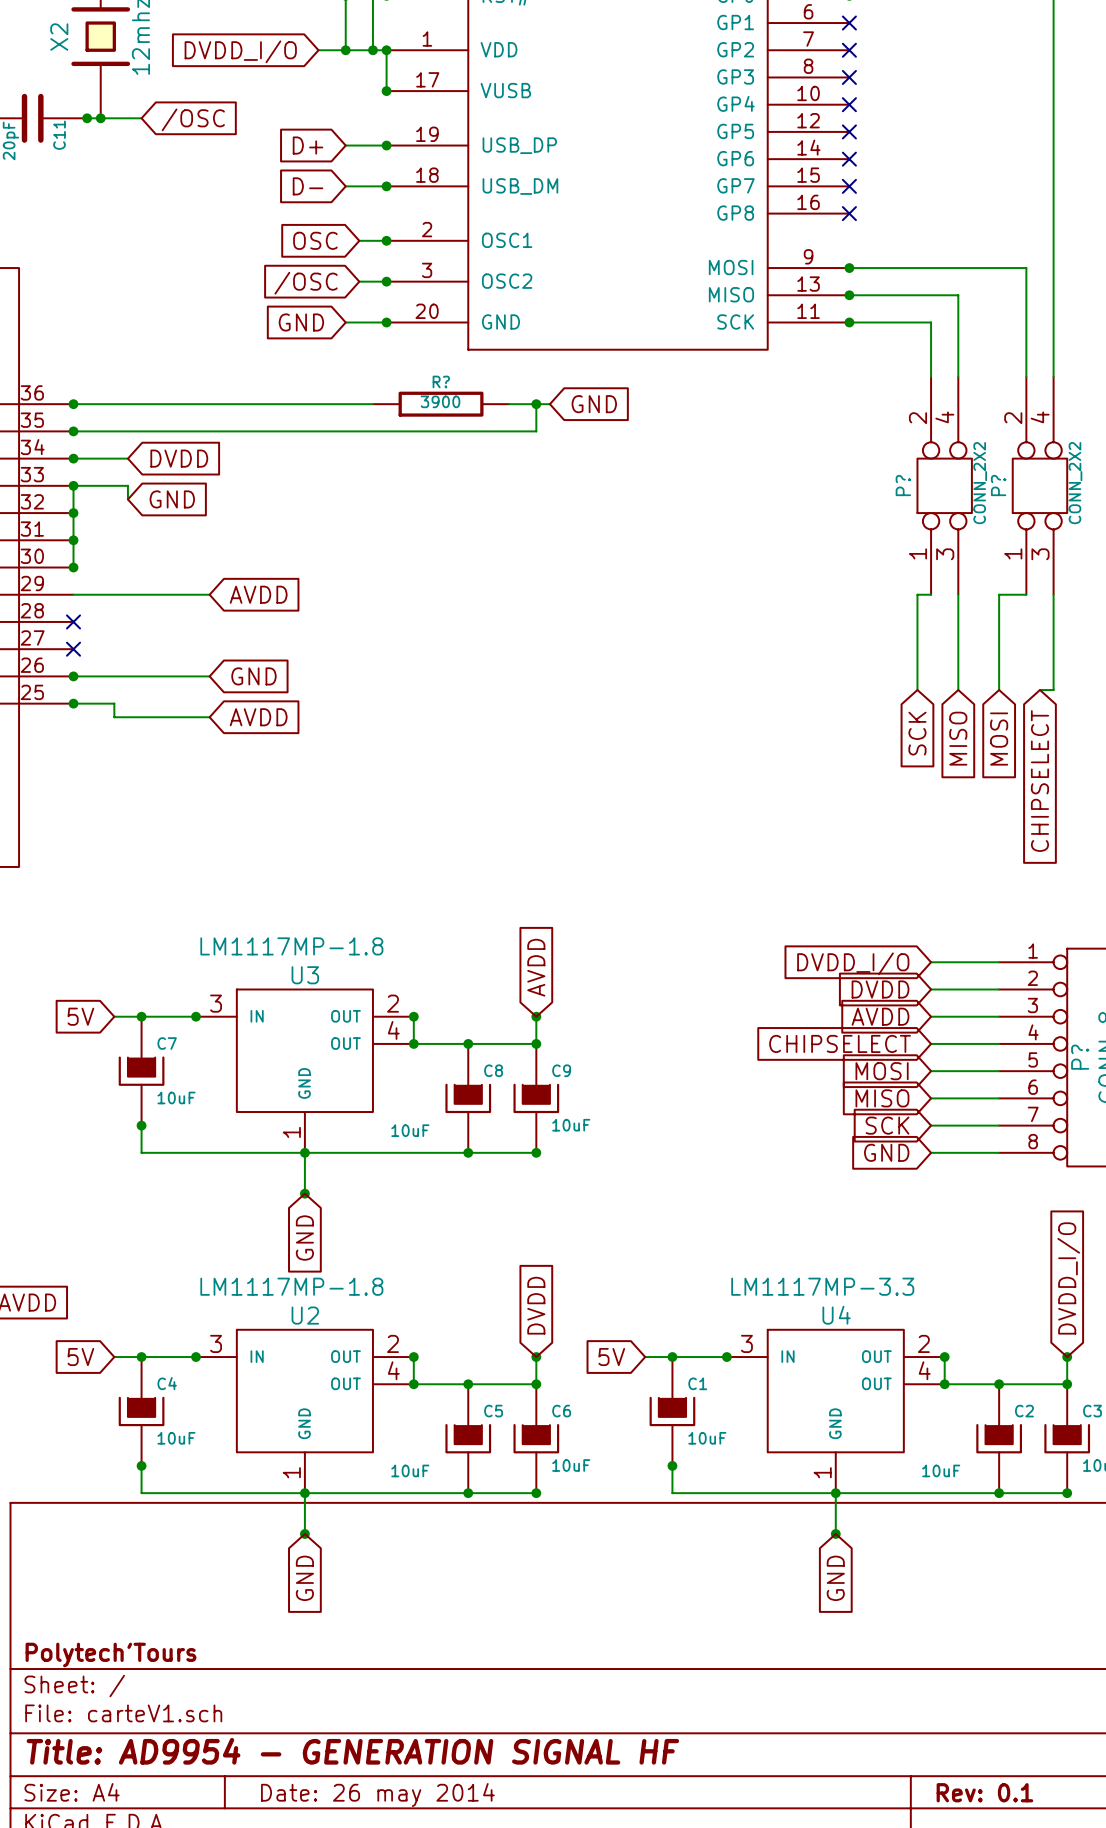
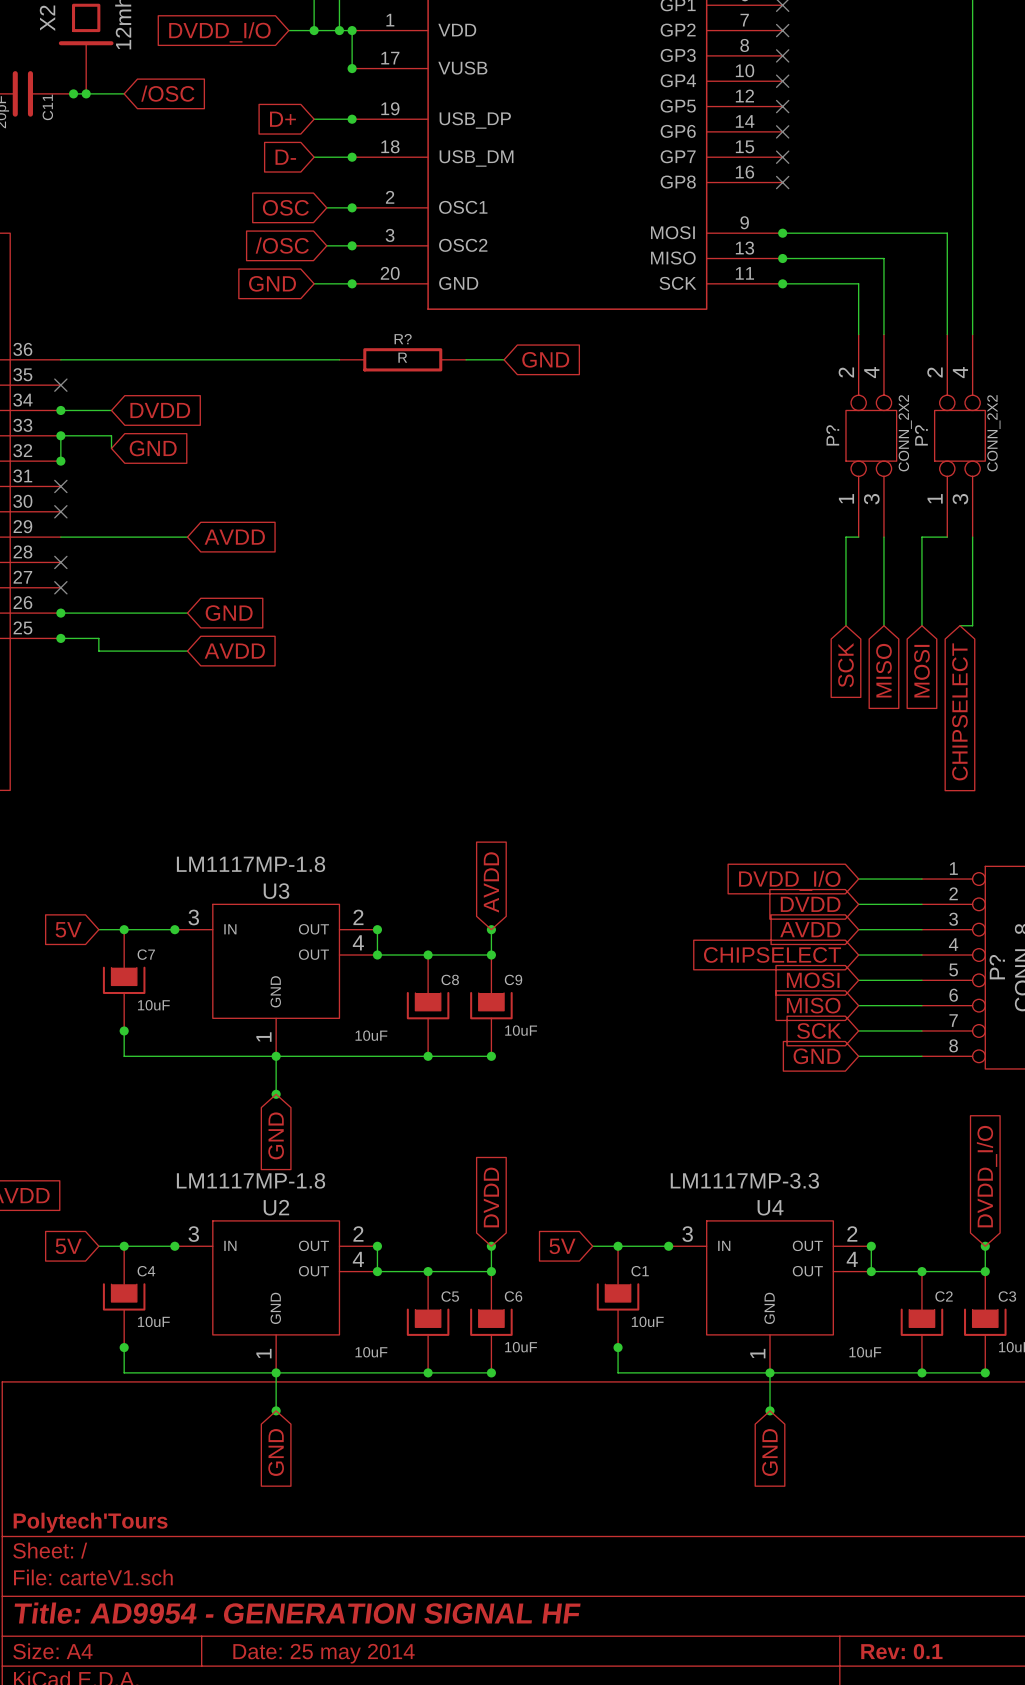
R? value: 3900 (440, 401) -> R (402, 357)
junction: (73, 404) -> none
wire: (536, 404) (536, 431) (73, 431) -> none
junction: (536, 404) -> none
junction: (73, 431) -> none
no-connect mark: none -> (60, 385)
wire: (73, 513) (73, 567) -> none
junction: (73, 540) -> none
no-connect mark: none -> (60, 486)
junction: (73, 567) -> none
no-connect mark: none -> (60, 511)
title block: Date: 26 may 2014 (377, 1795) -> Date: 25 may 2014 (324, 1653)

